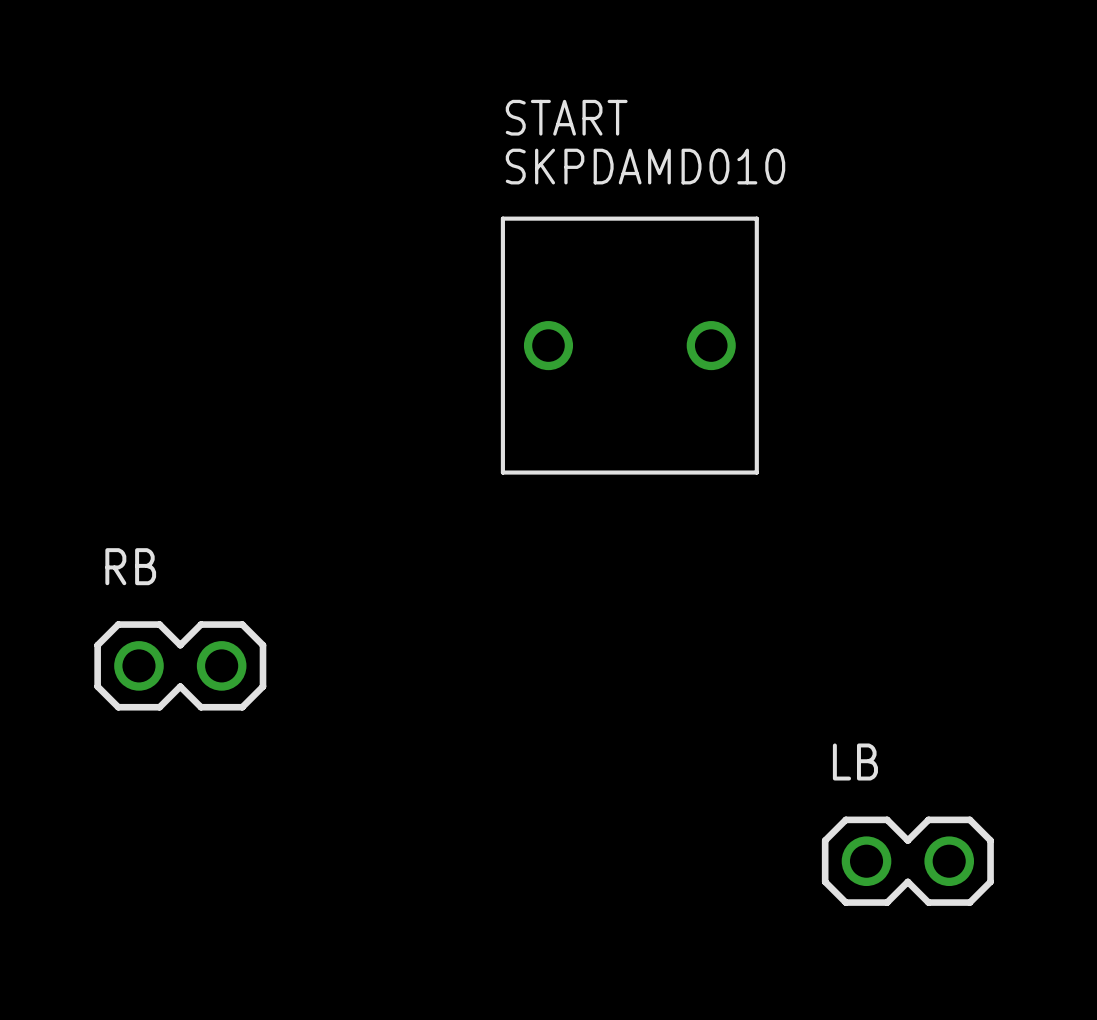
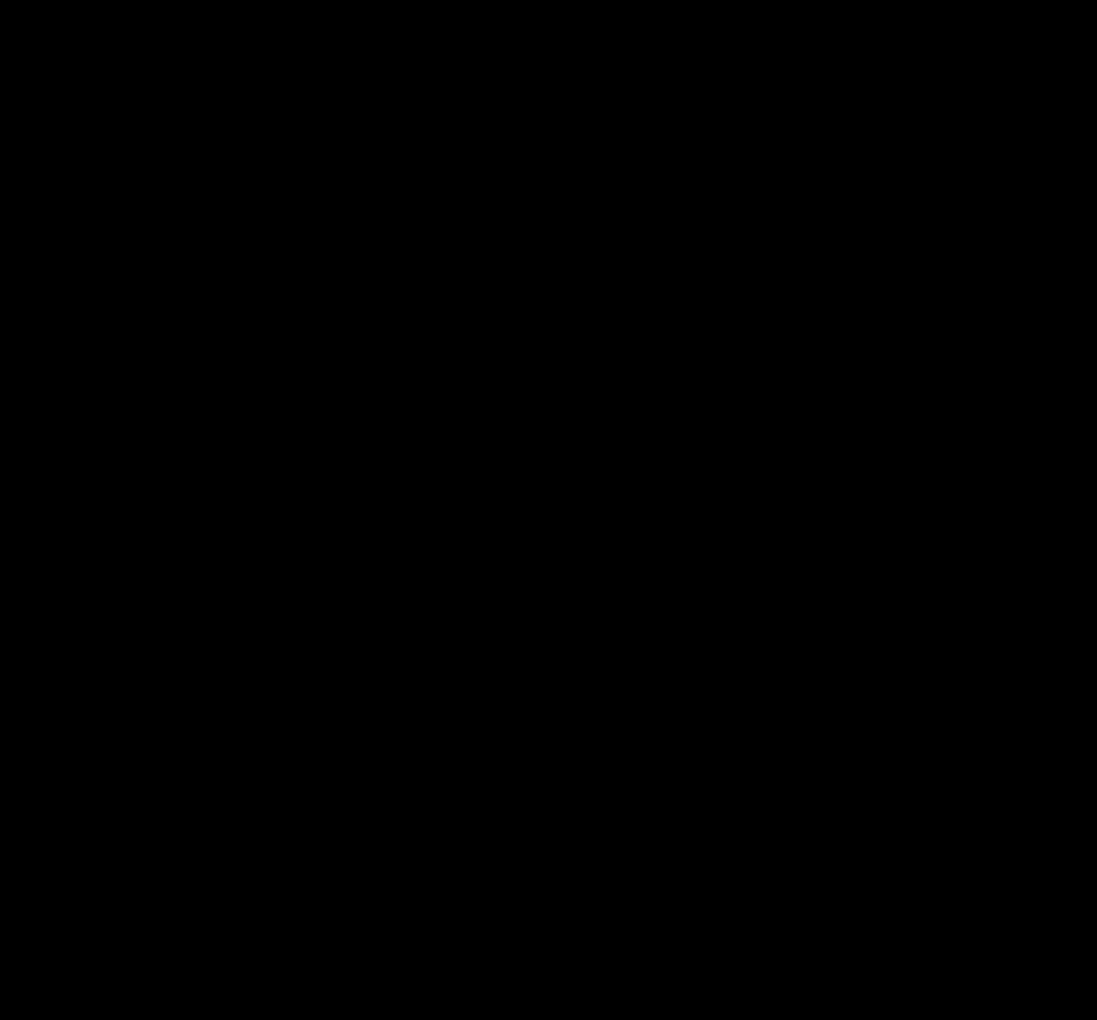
START: SKPDAMD010 (629, 345) -> none
RB: (180, 665) -> none
LB: (907, 861) -> none

